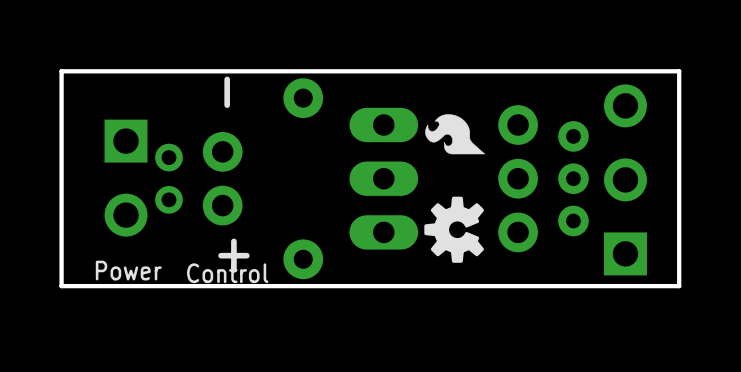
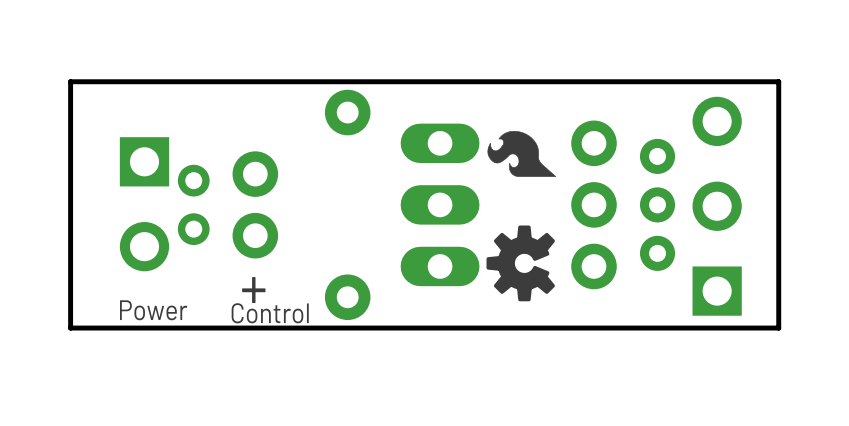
text: - (227, 92) -> none

